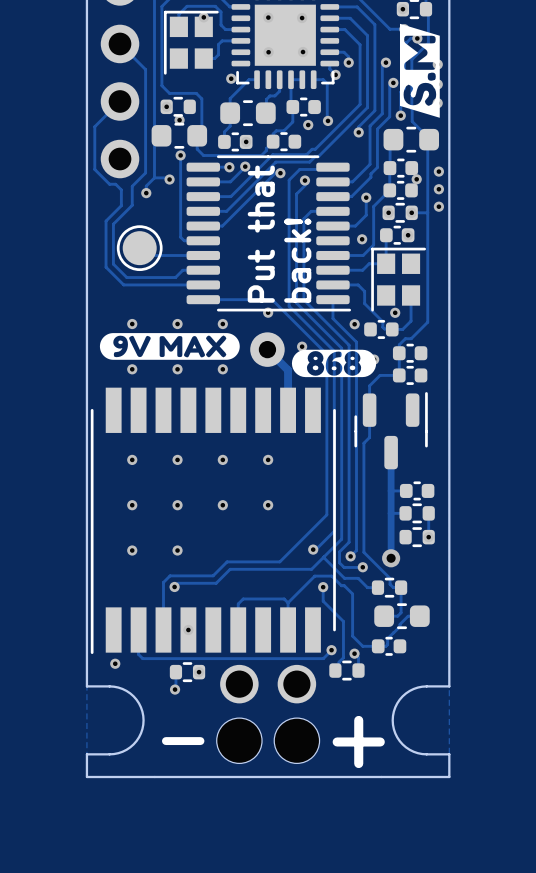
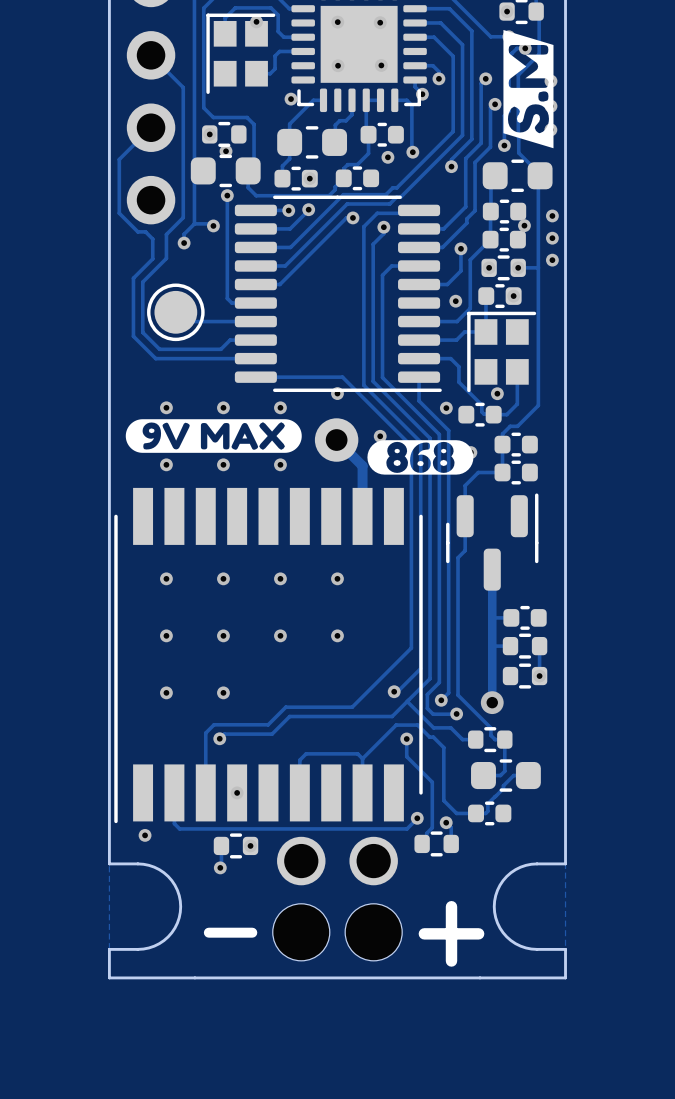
text: Put that (261, 234) -> none
text: back! (297, 260) -> none

